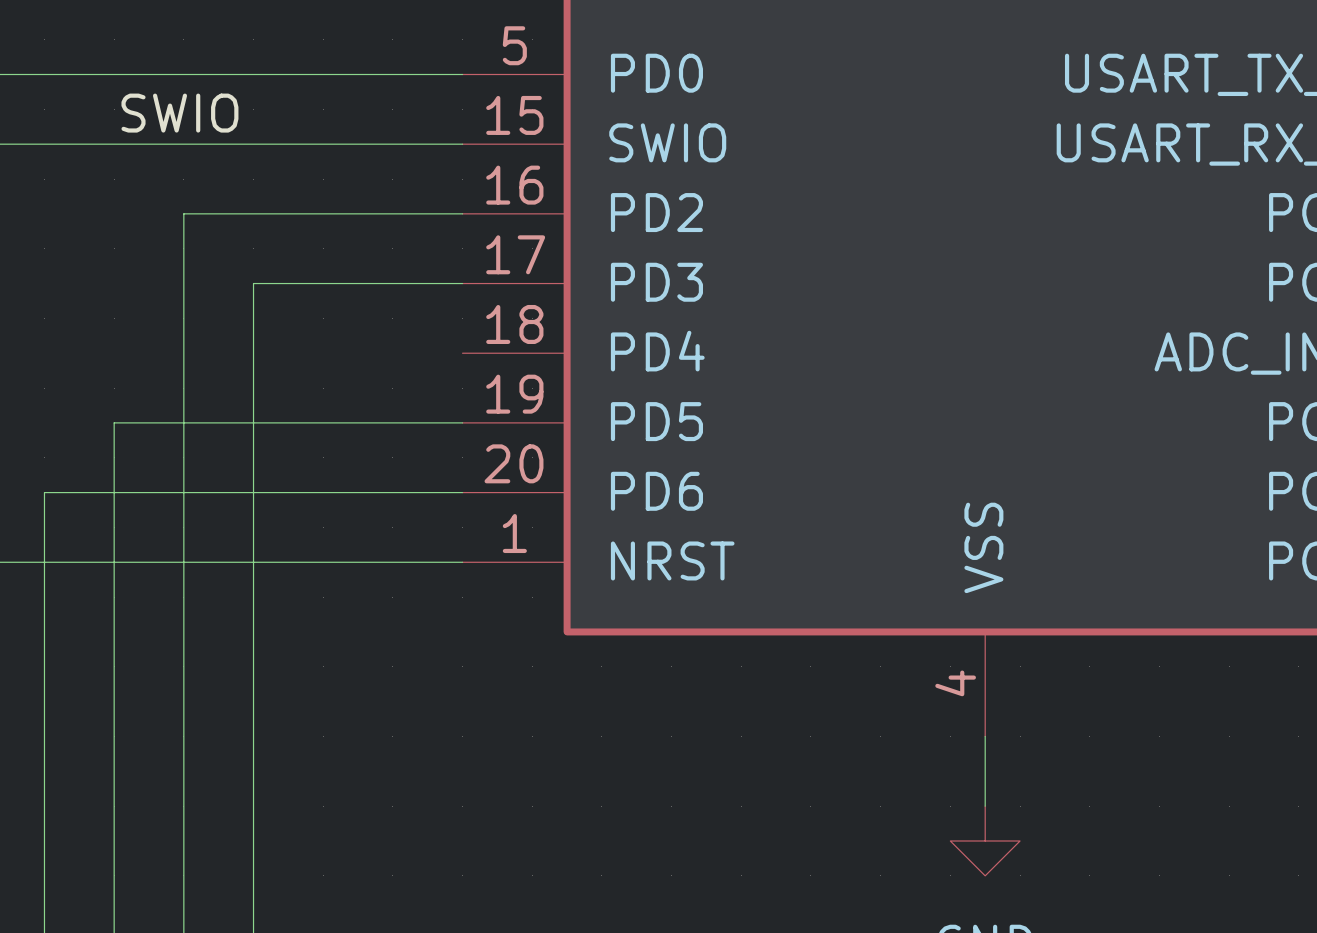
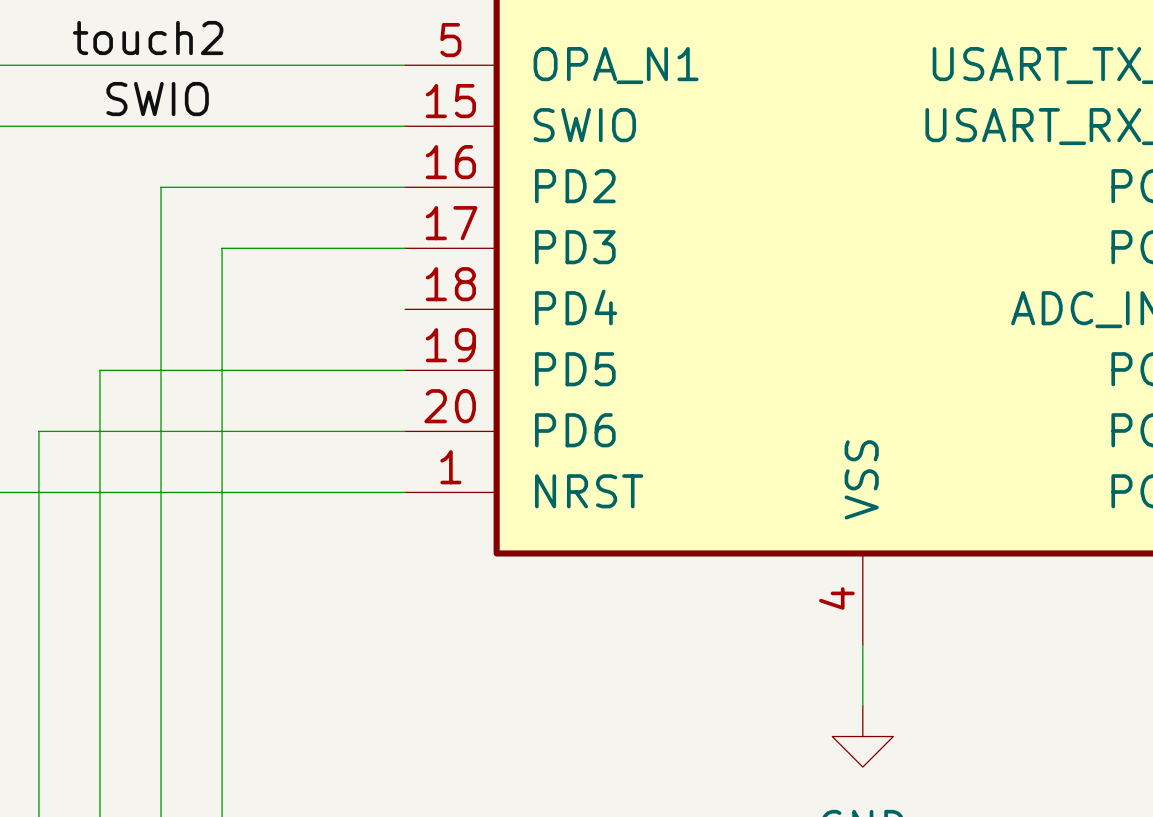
label: none -> touch2 (148, 38)
part pin name: PD0 (656, 73) -> OPA_N1 (616, 65)

